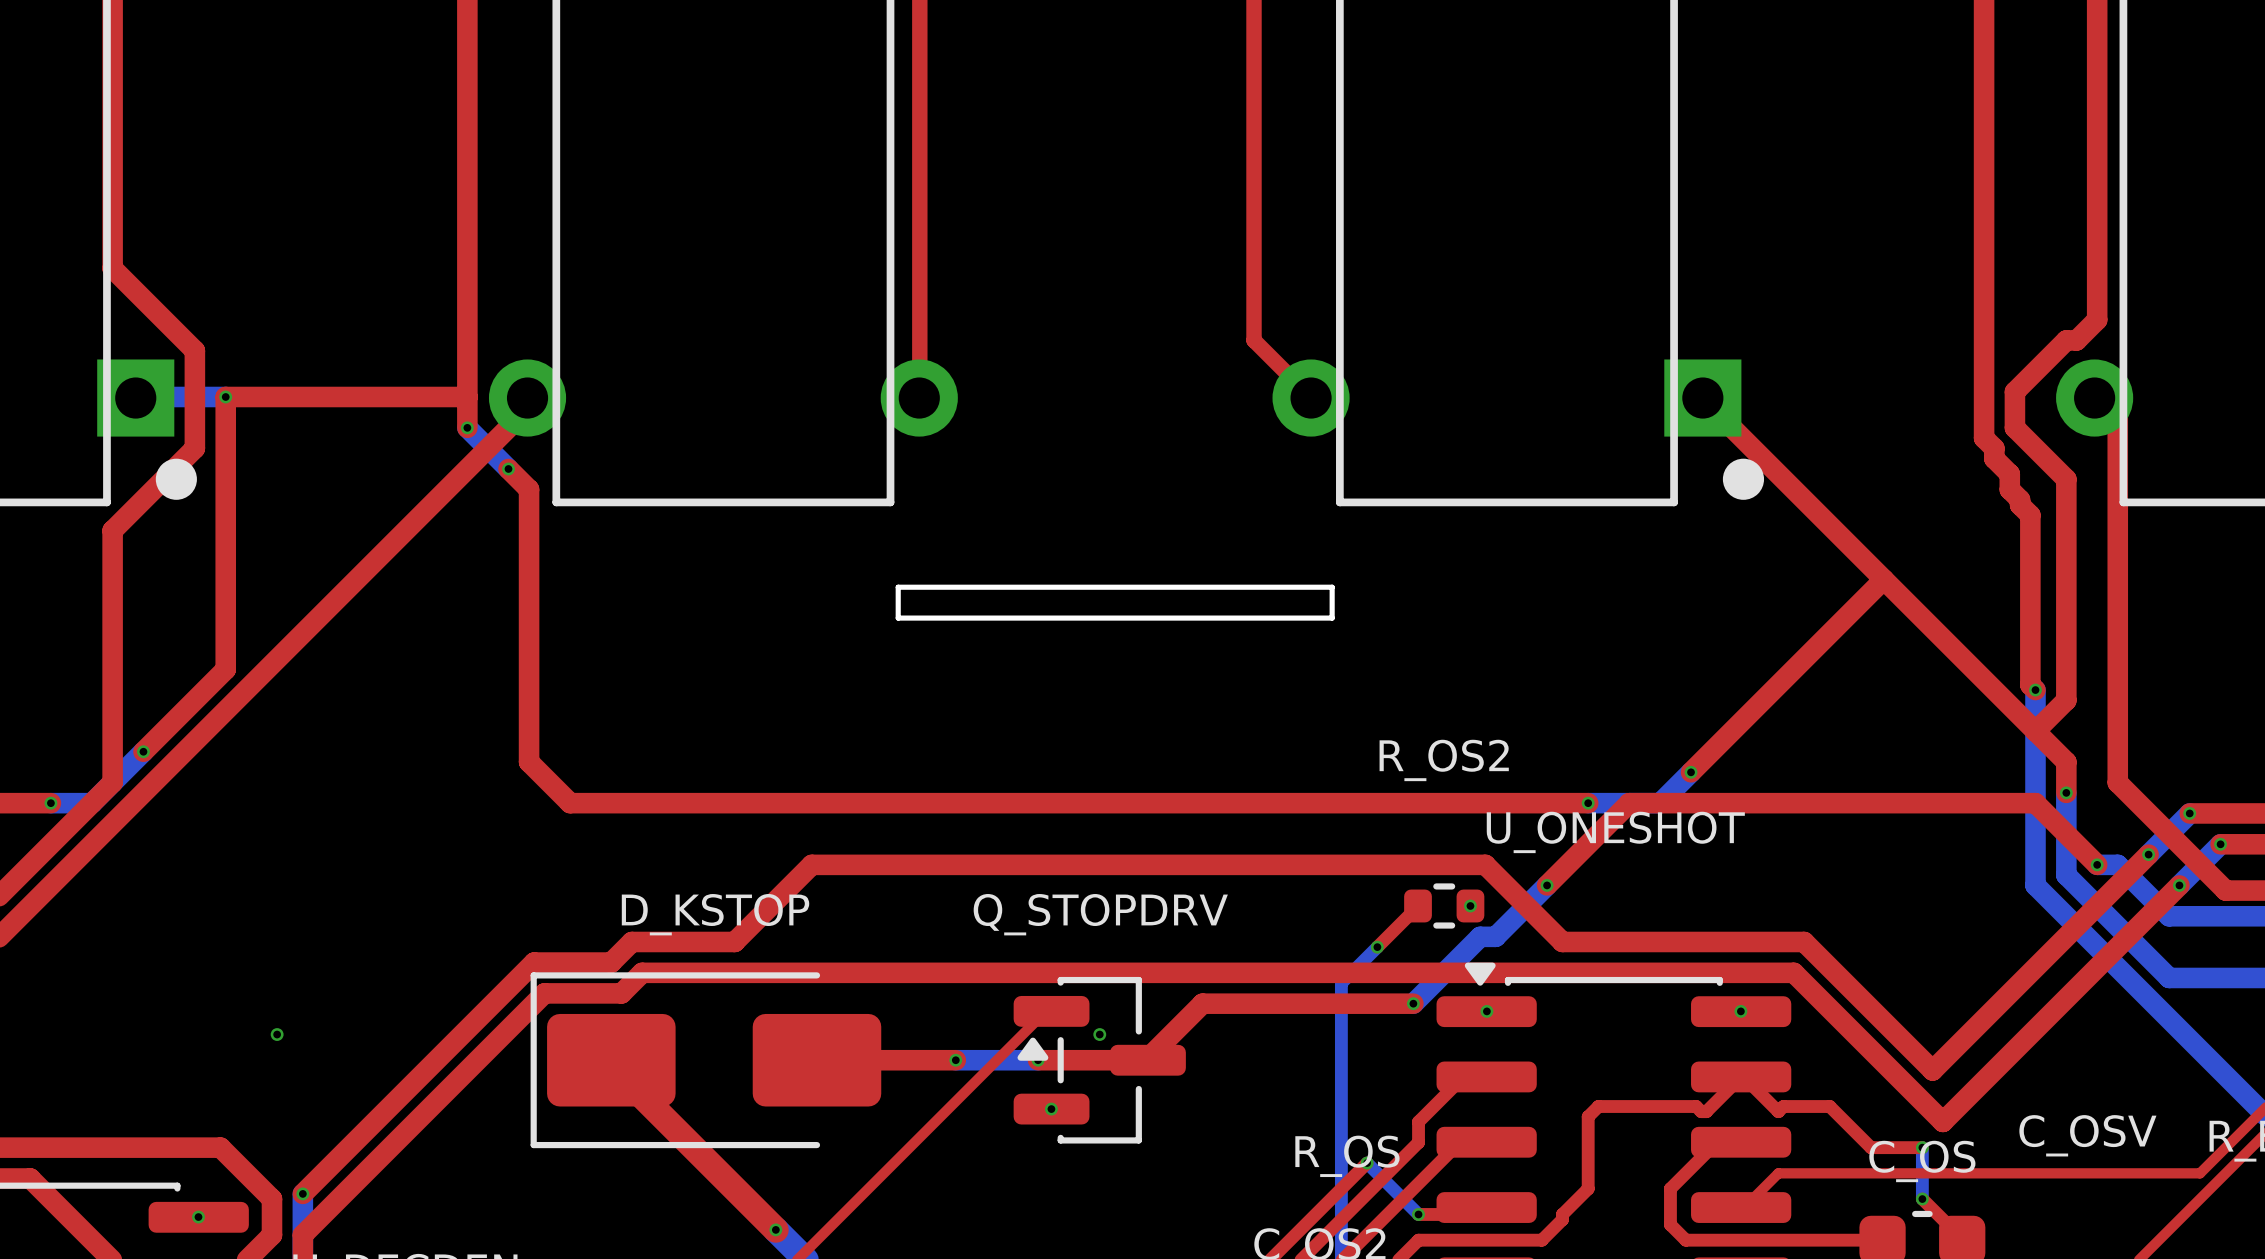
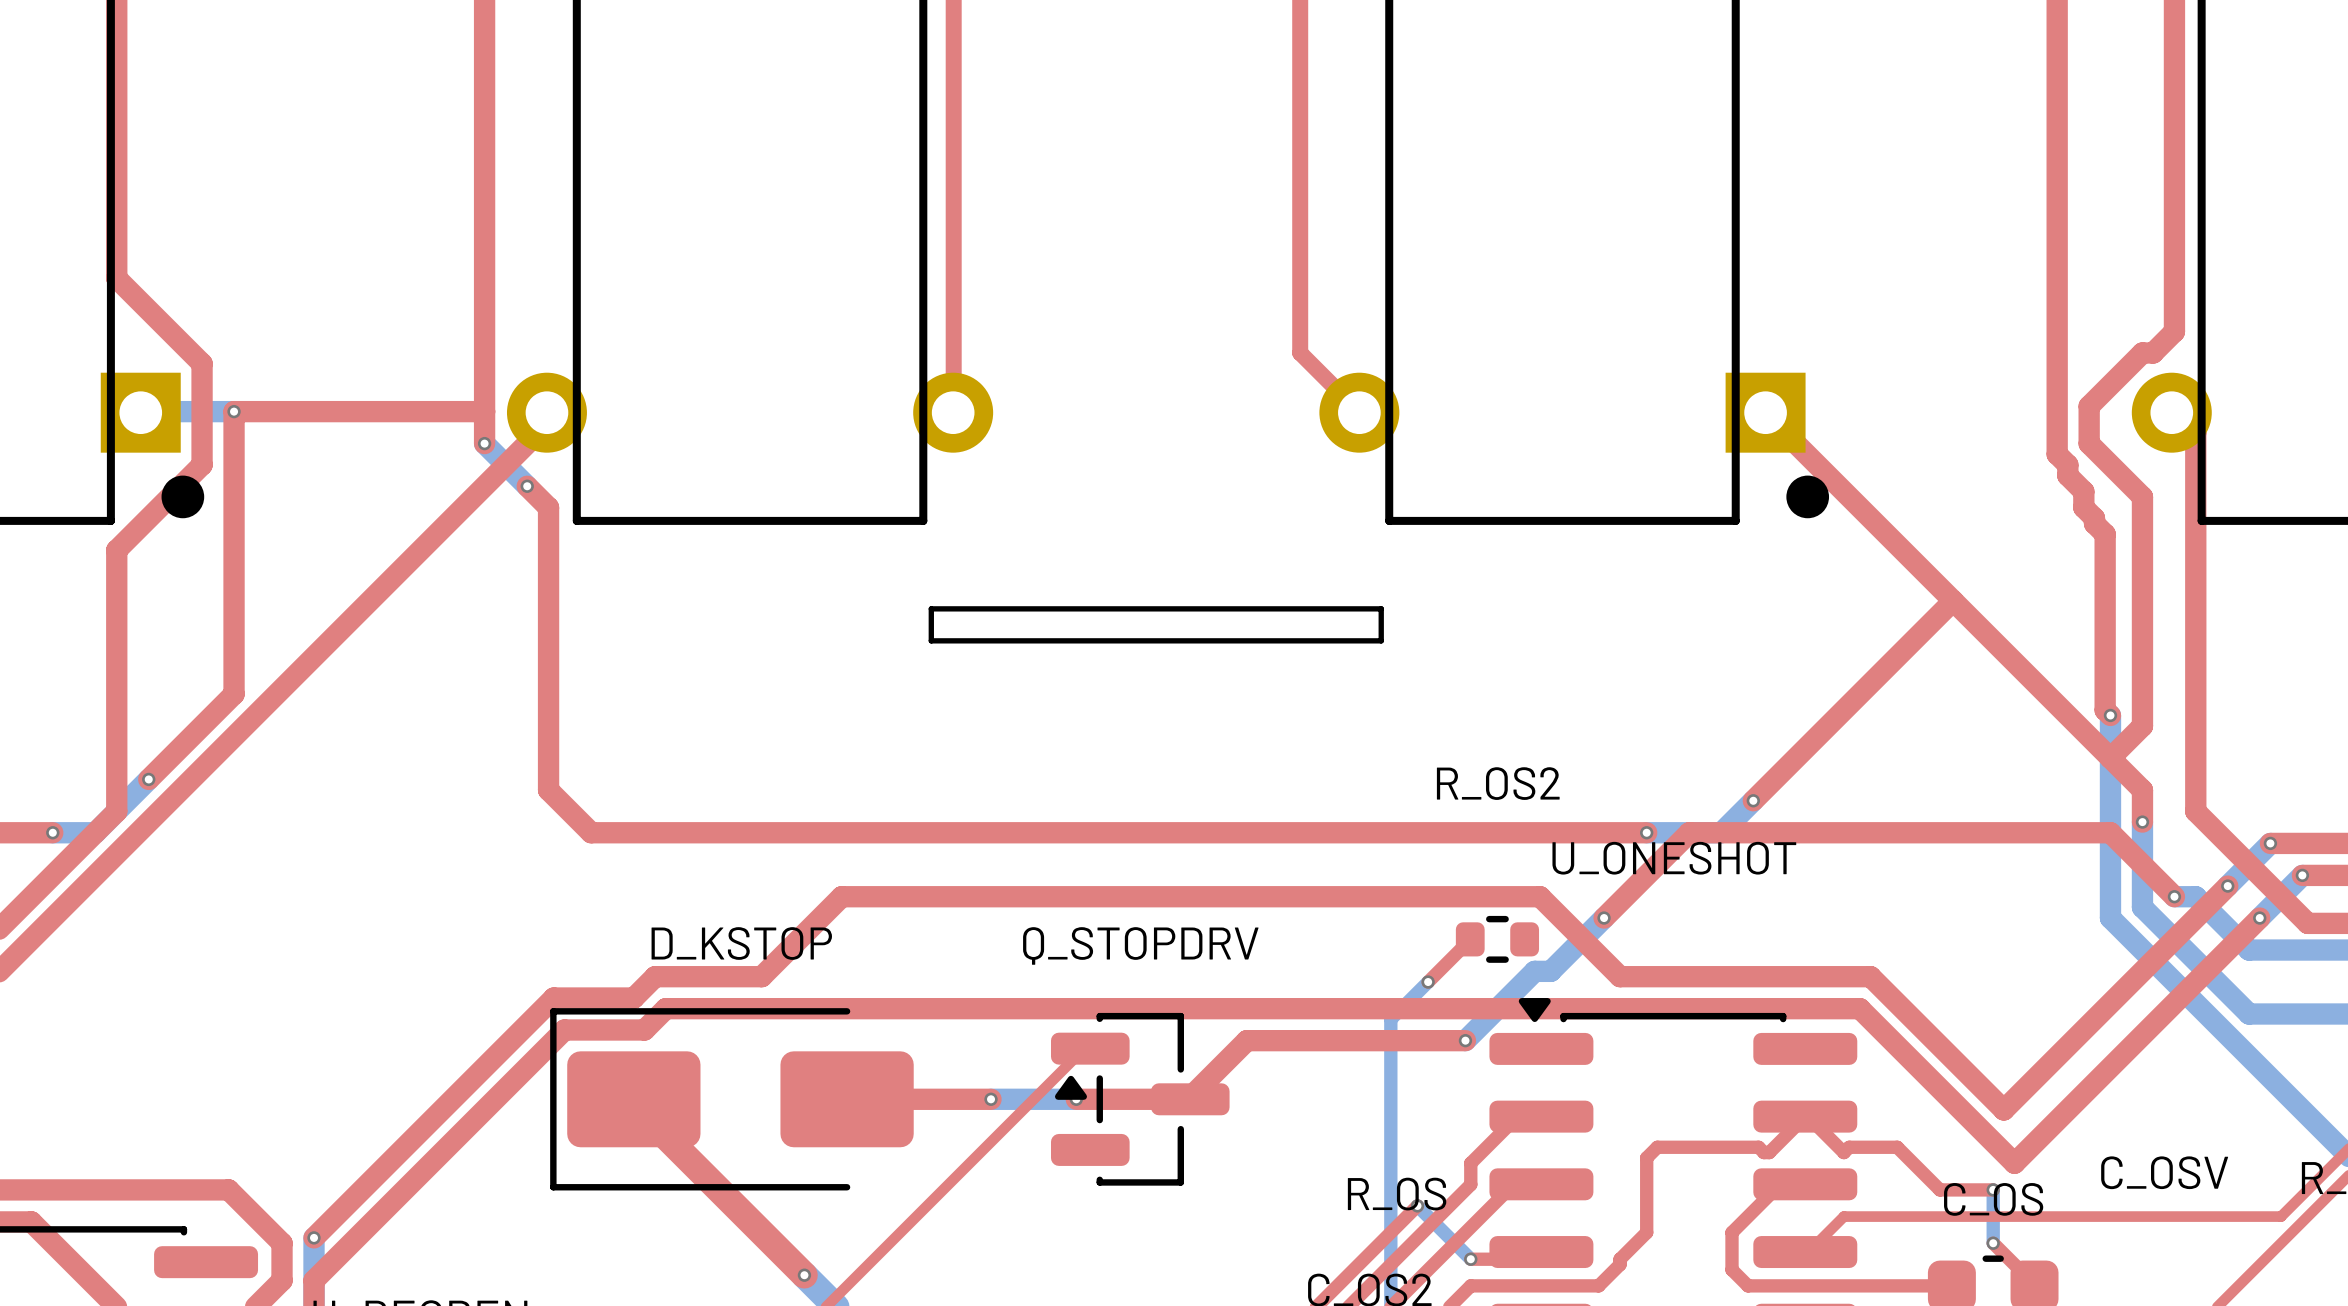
via: (1470, 905) -> none
via: (1486, 1011) -> none
via: (1740, 1011) -> none
via: (277, 1034) -> none
via: (1099, 1034) -> none
via: (1051, 1109) -> none
via: (198, 1217) -> none

